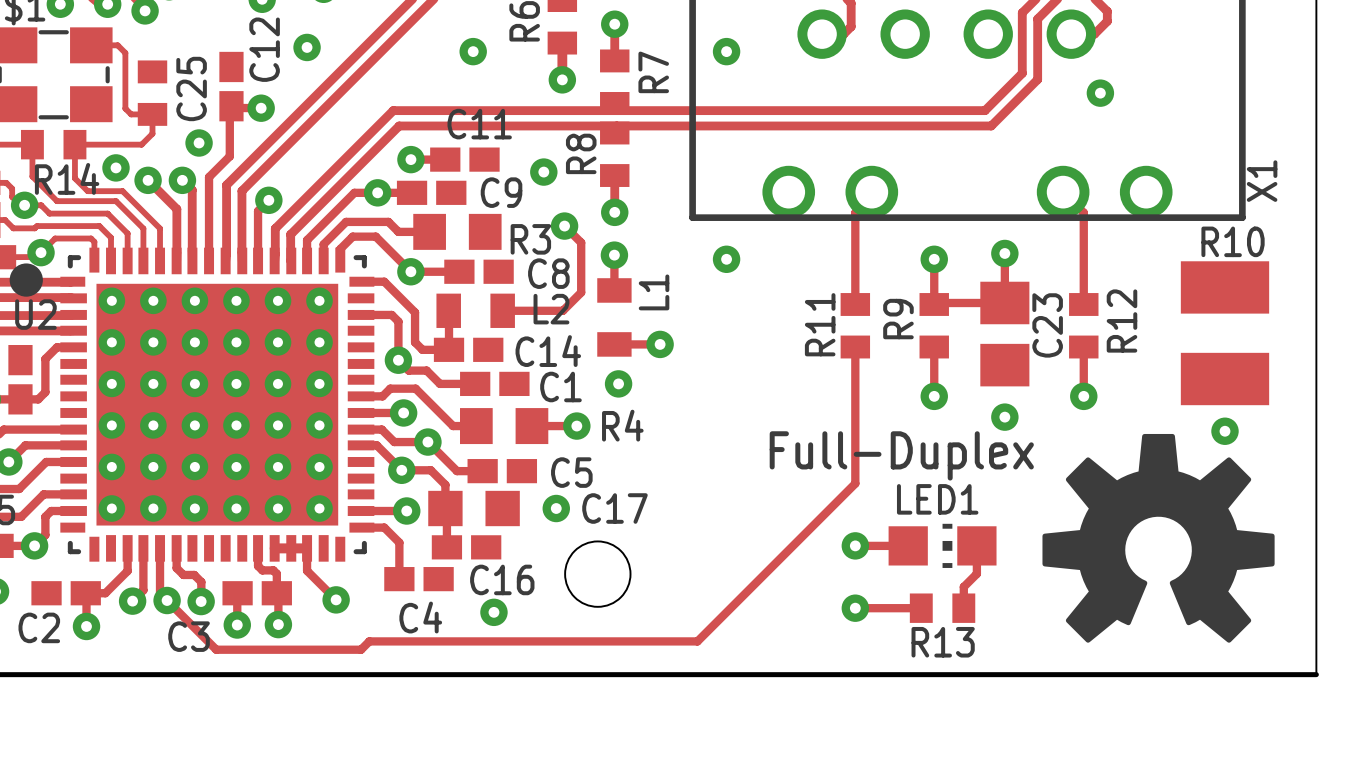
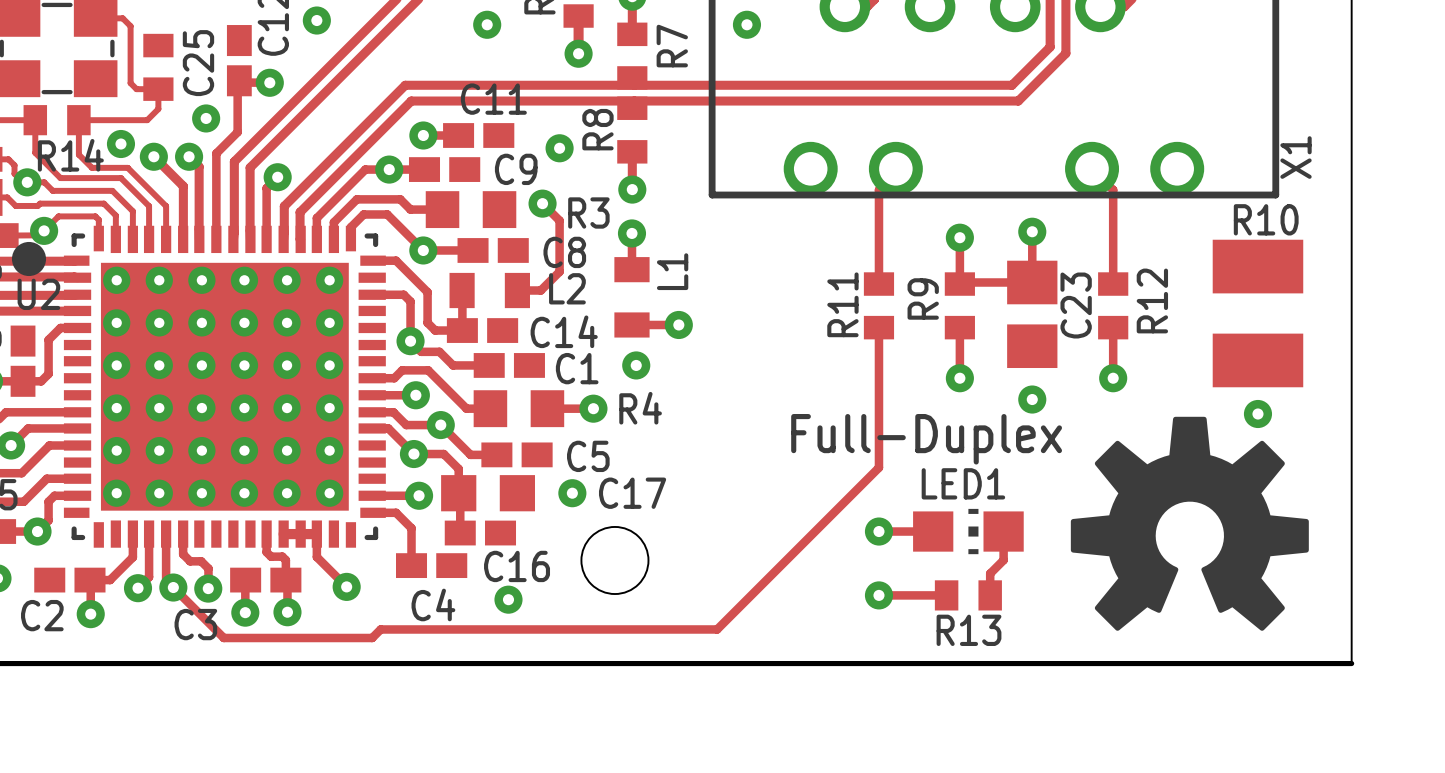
via: (1100, 93) -> none
track: (564, 226) (581, 242) (581, 292) (562, 310) (525, 310) -> (542, 203) (559, 220) (559, 271) (540, 290)
via position: (564, 226) -> (542, 203)
R3 name position: R3 (530, 239) -> R3 (588, 213)
via: (726, 259) -> none

